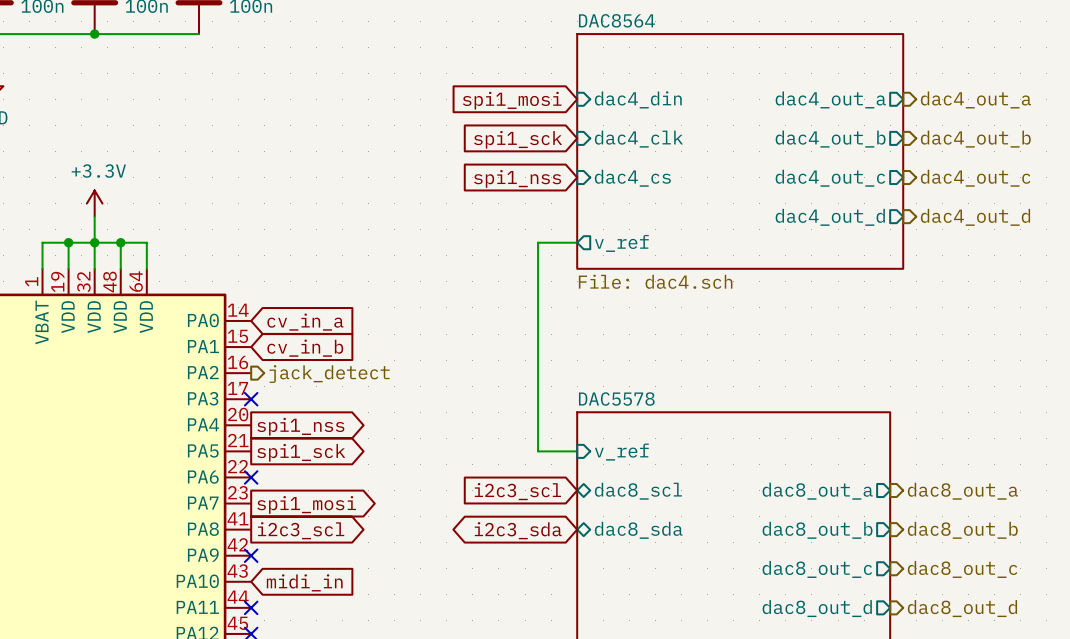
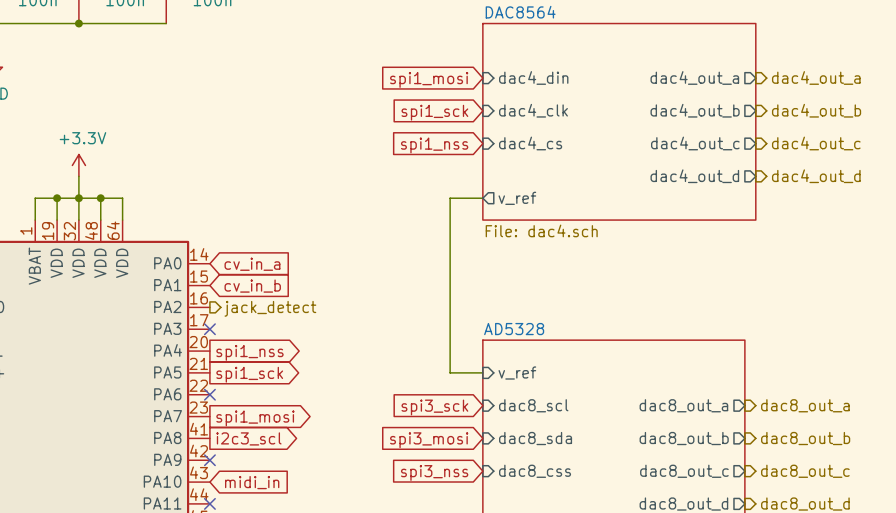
sheet DAC5578 name: DAC5578 (616, 399) -> AD5328 (514, 329)
global label: i2c3_scl (517, 491) -> spi3_sck (434, 407)
sheet pin shape: bidirectional (638, 491) -> input (533, 405)
global label shape: bidirectional (518, 530) -> input (429, 440)
global label: i2c3_sda (518, 530) -> spi3_mosi (429, 440)
sheet pin shape: bidirectional (638, 530) -> input (535, 438)
sheet pin: none -> dac8_css (535, 471)
global label: none -> spi3_nss (434, 472)

